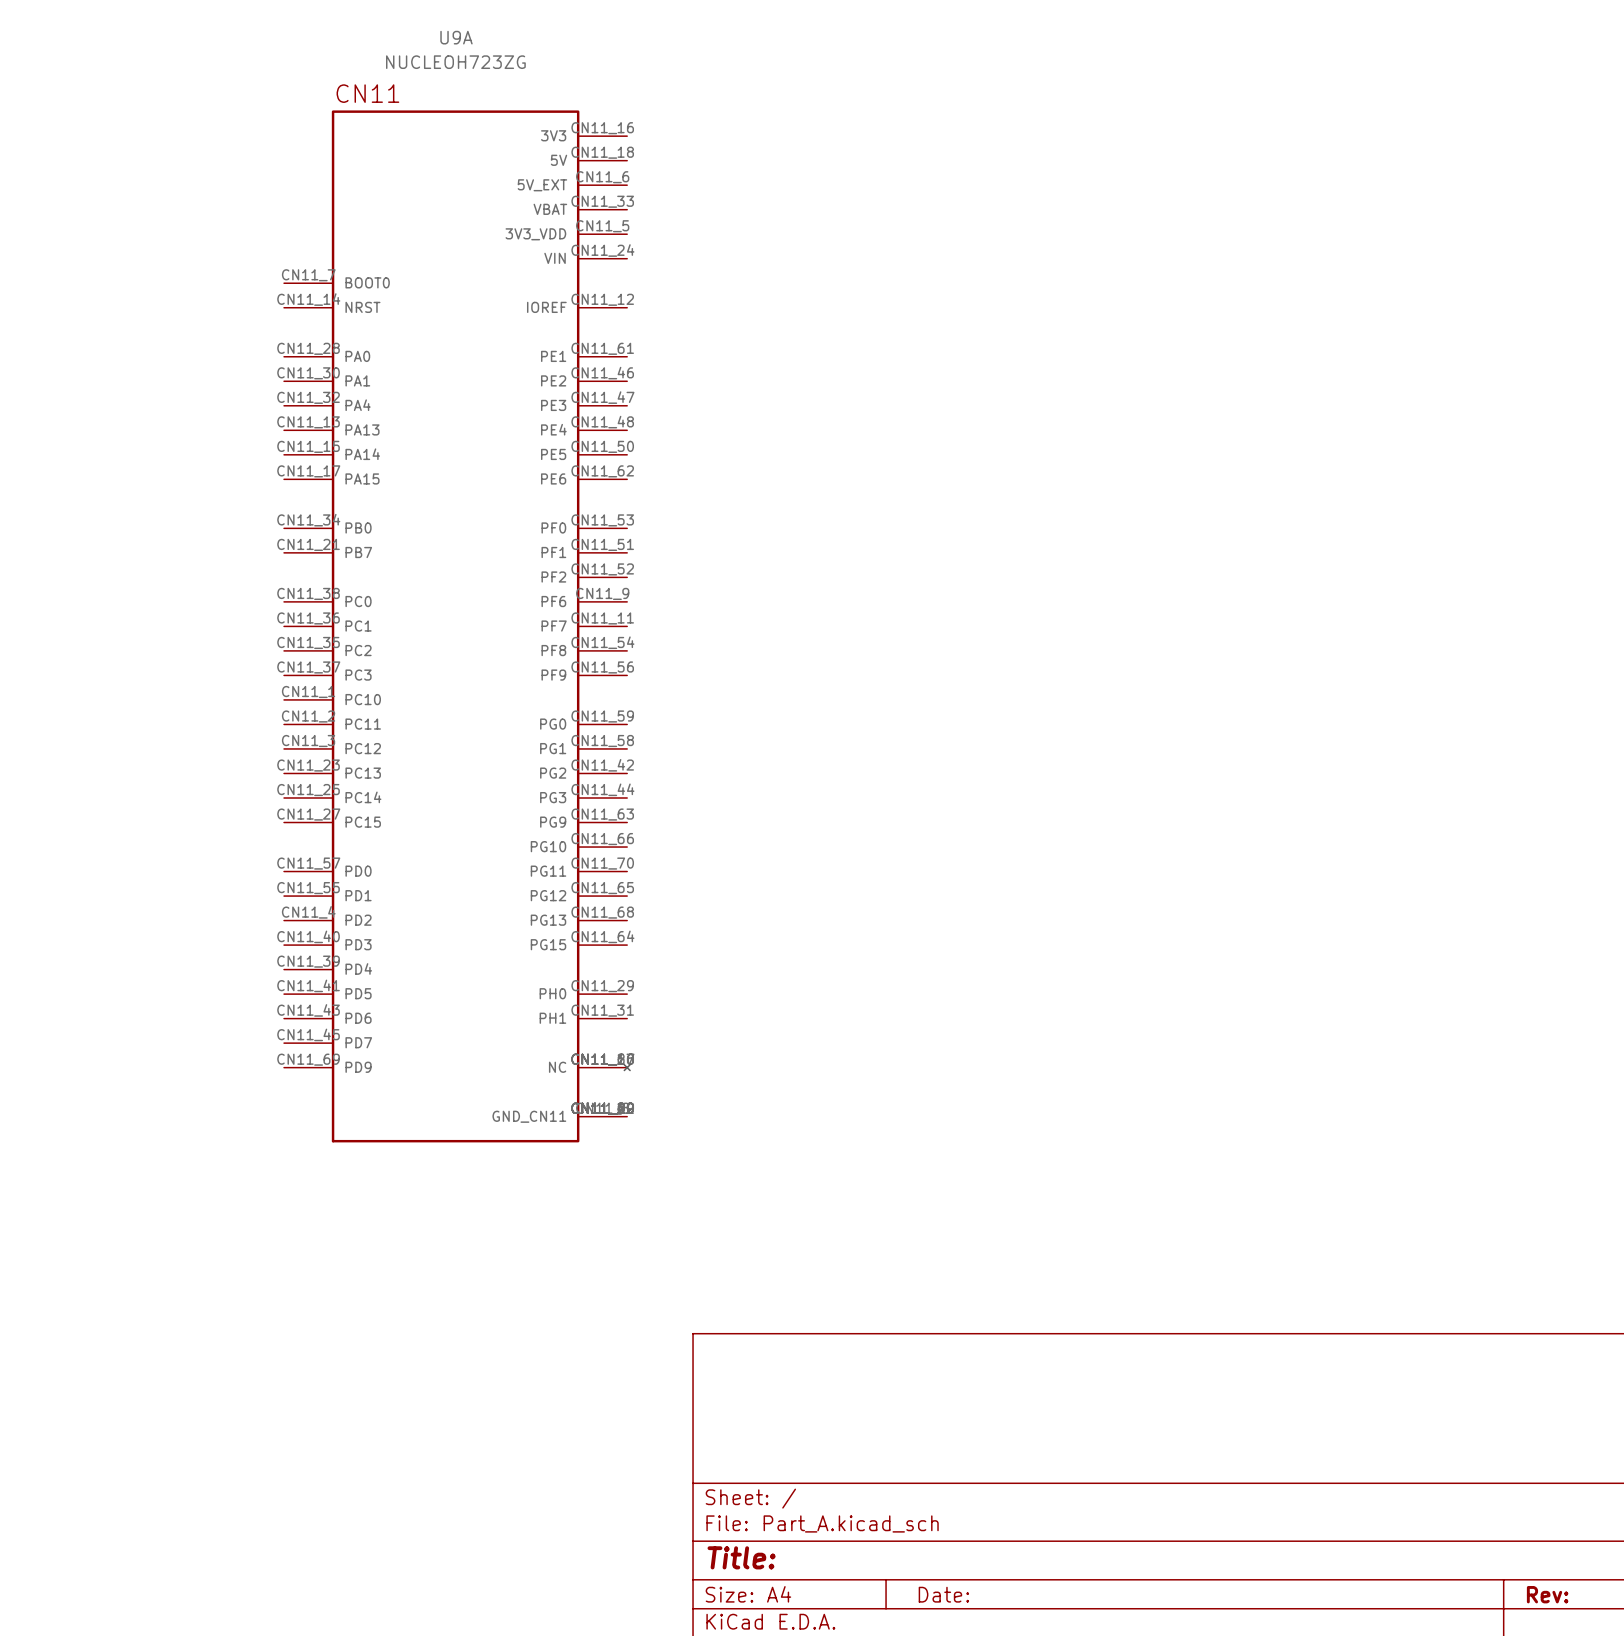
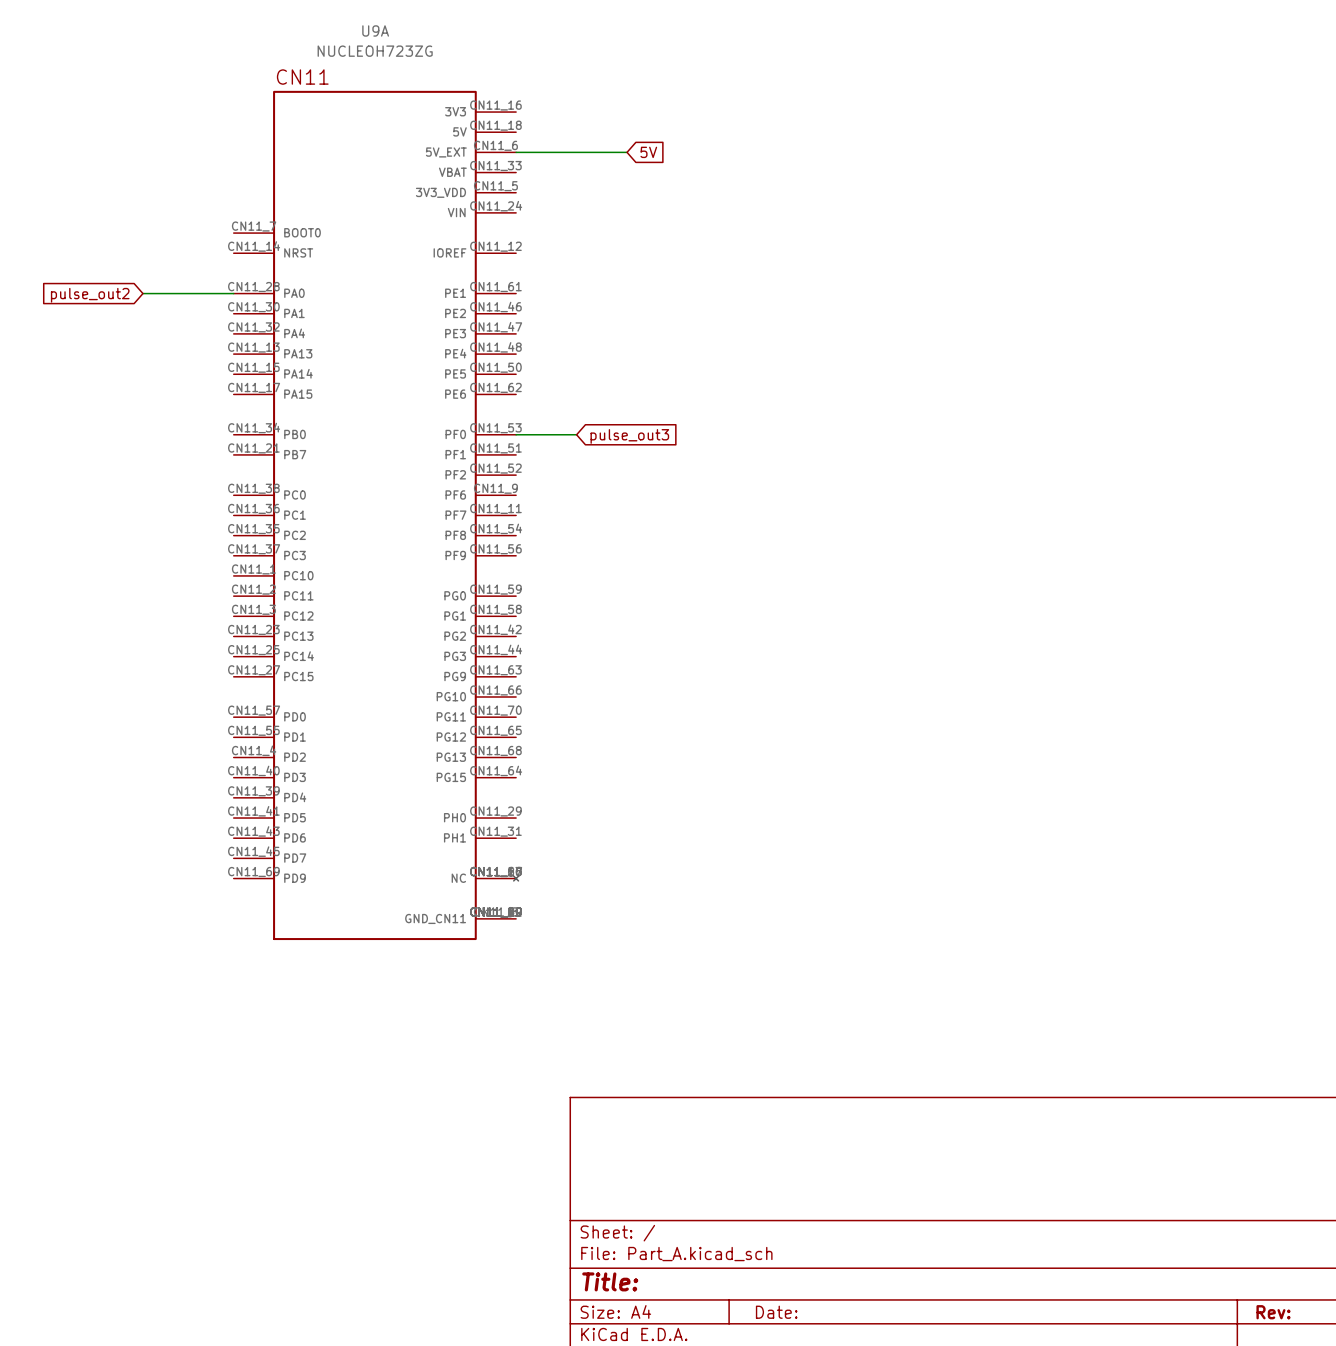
wire: none -> (516, 152) (627, 152)
global label: none -> 5V (648, 152)
wire: none -> (142, 293) (233, 293)
global label: none -> pulse_out2 (90, 295)
wire: none -> (516, 434) (576, 434)
global label: none -> pulse_out3 (629, 436)

